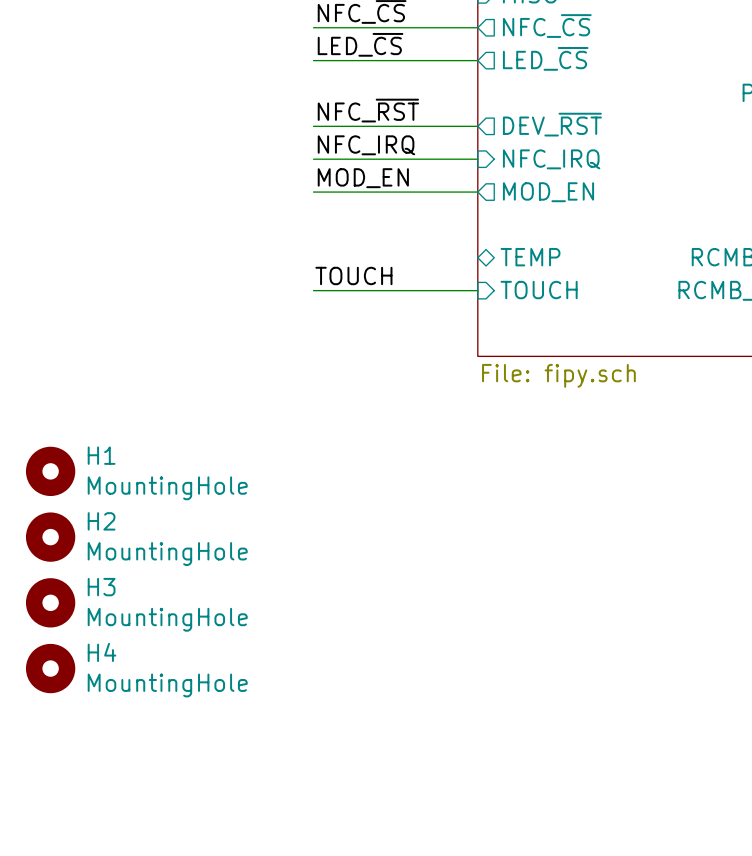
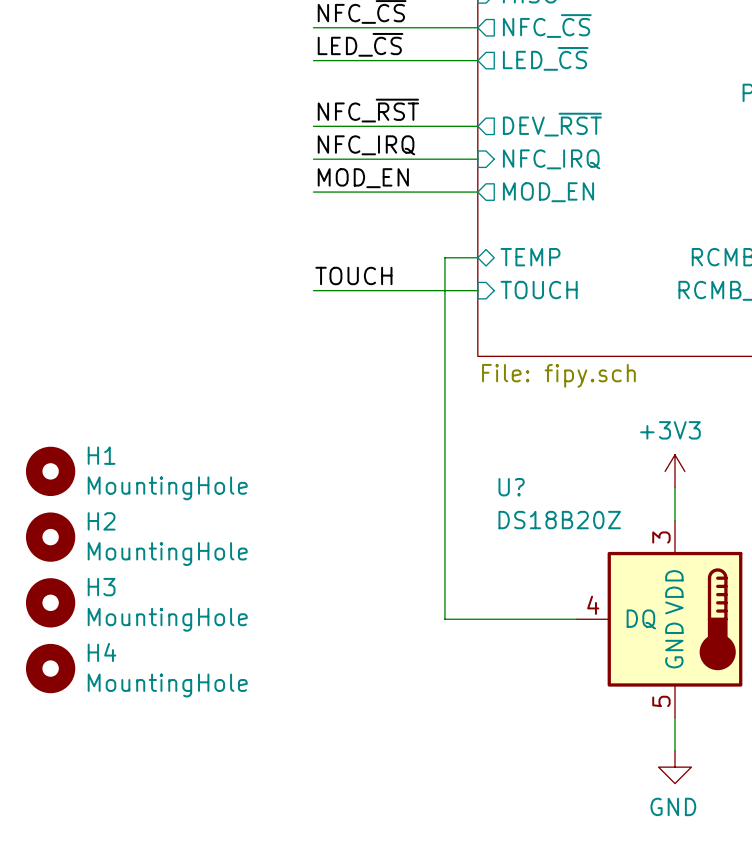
wire: none -> (477, 257) (444, 257) (444, 619) (576, 619)
power symbol: none -> +3V3 (674, 471)
wire: none -> (674, 487) (674, 520)
U?: none -> DS18B20Z (659, 619)
wire: none -> (674, 717) (674, 750)
power symbol: none -> GND (674, 767)

